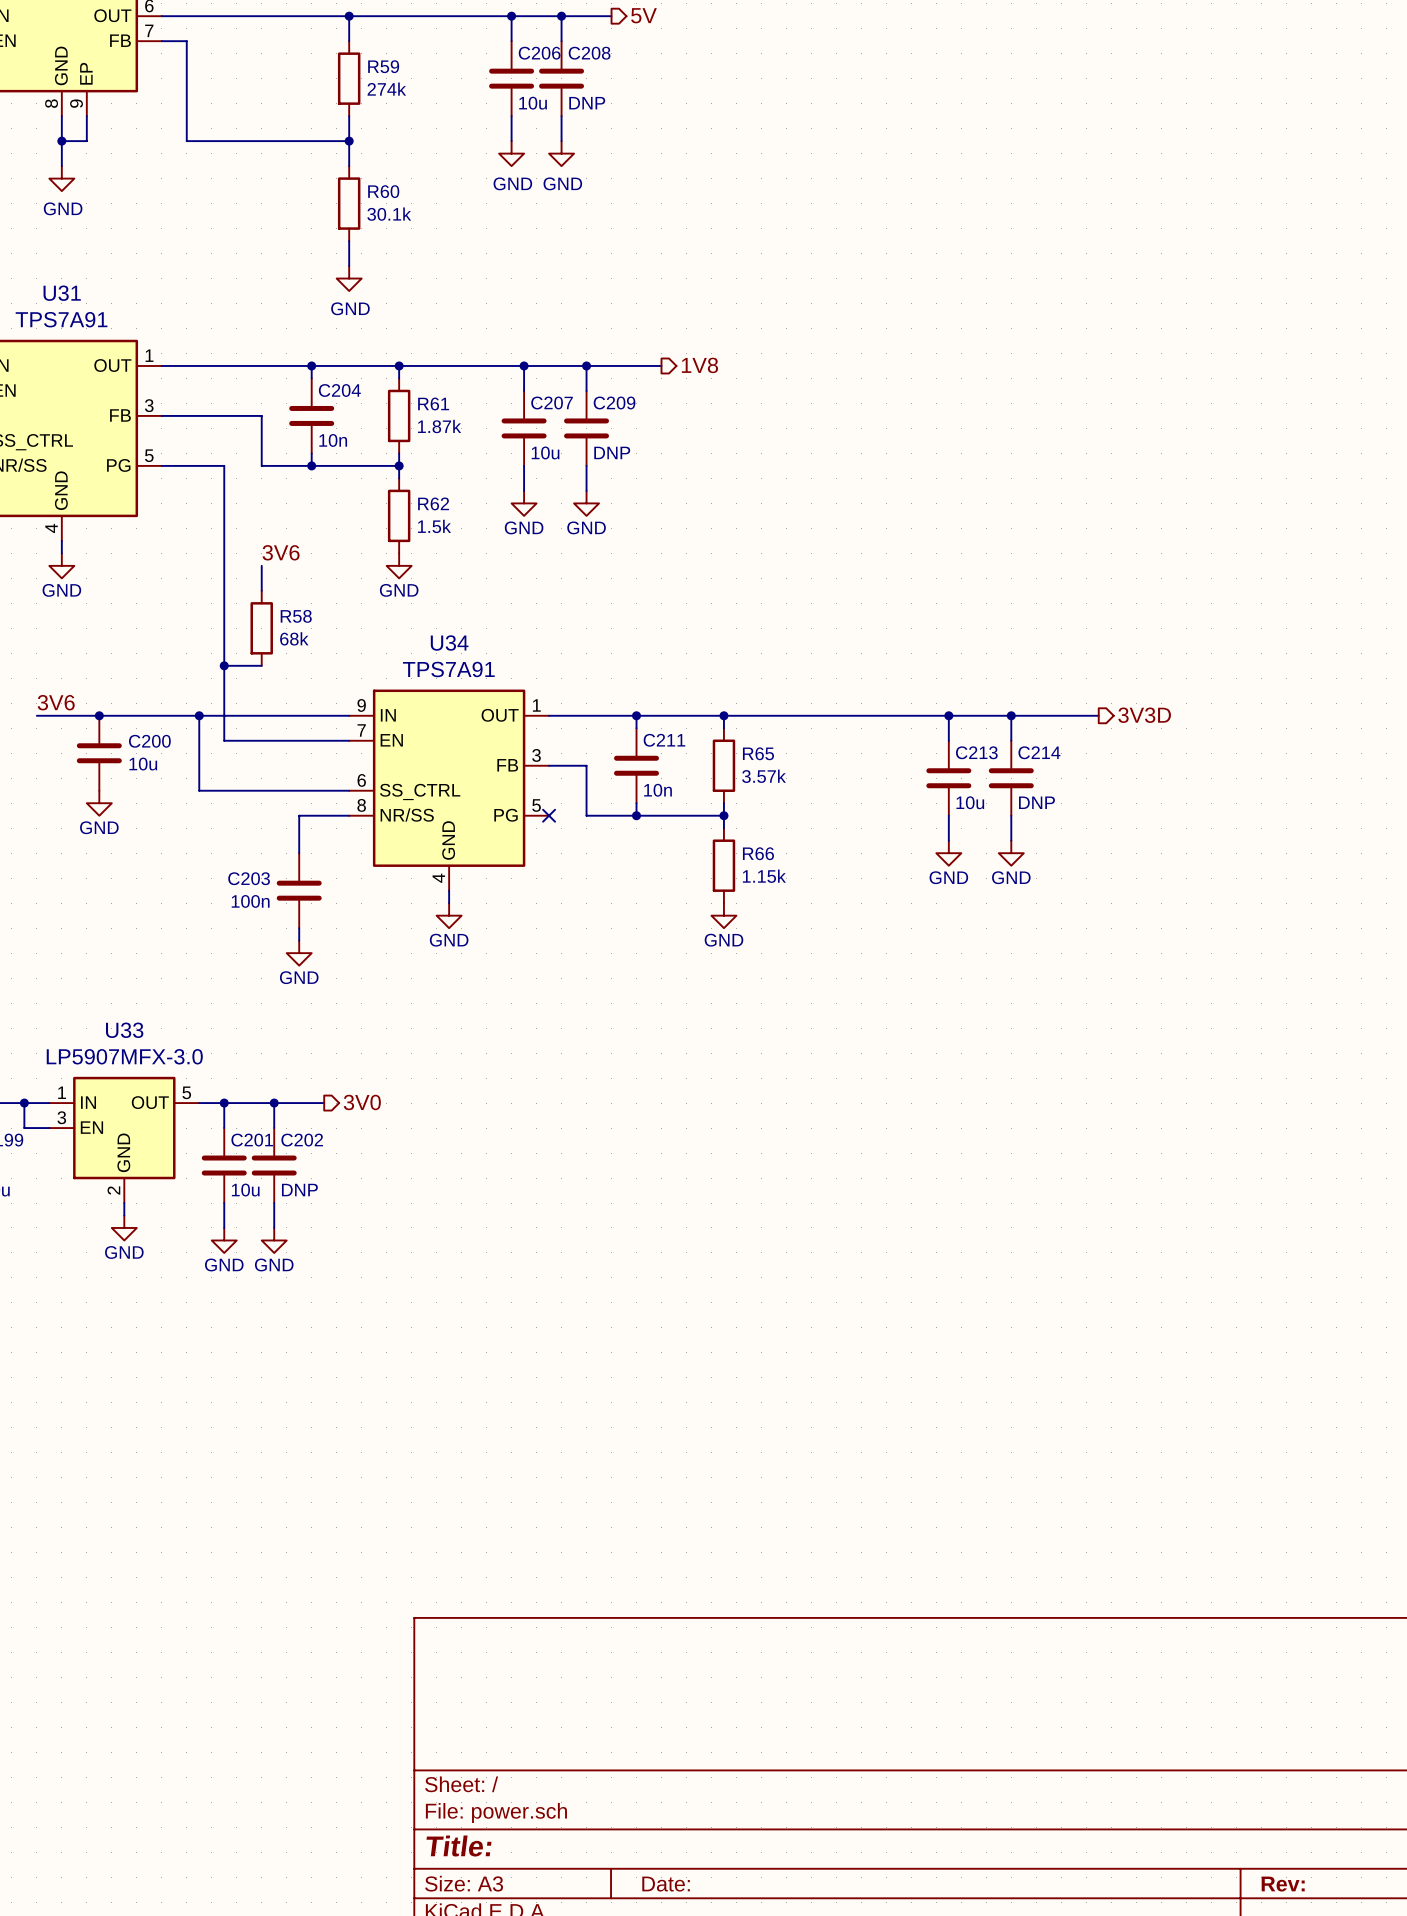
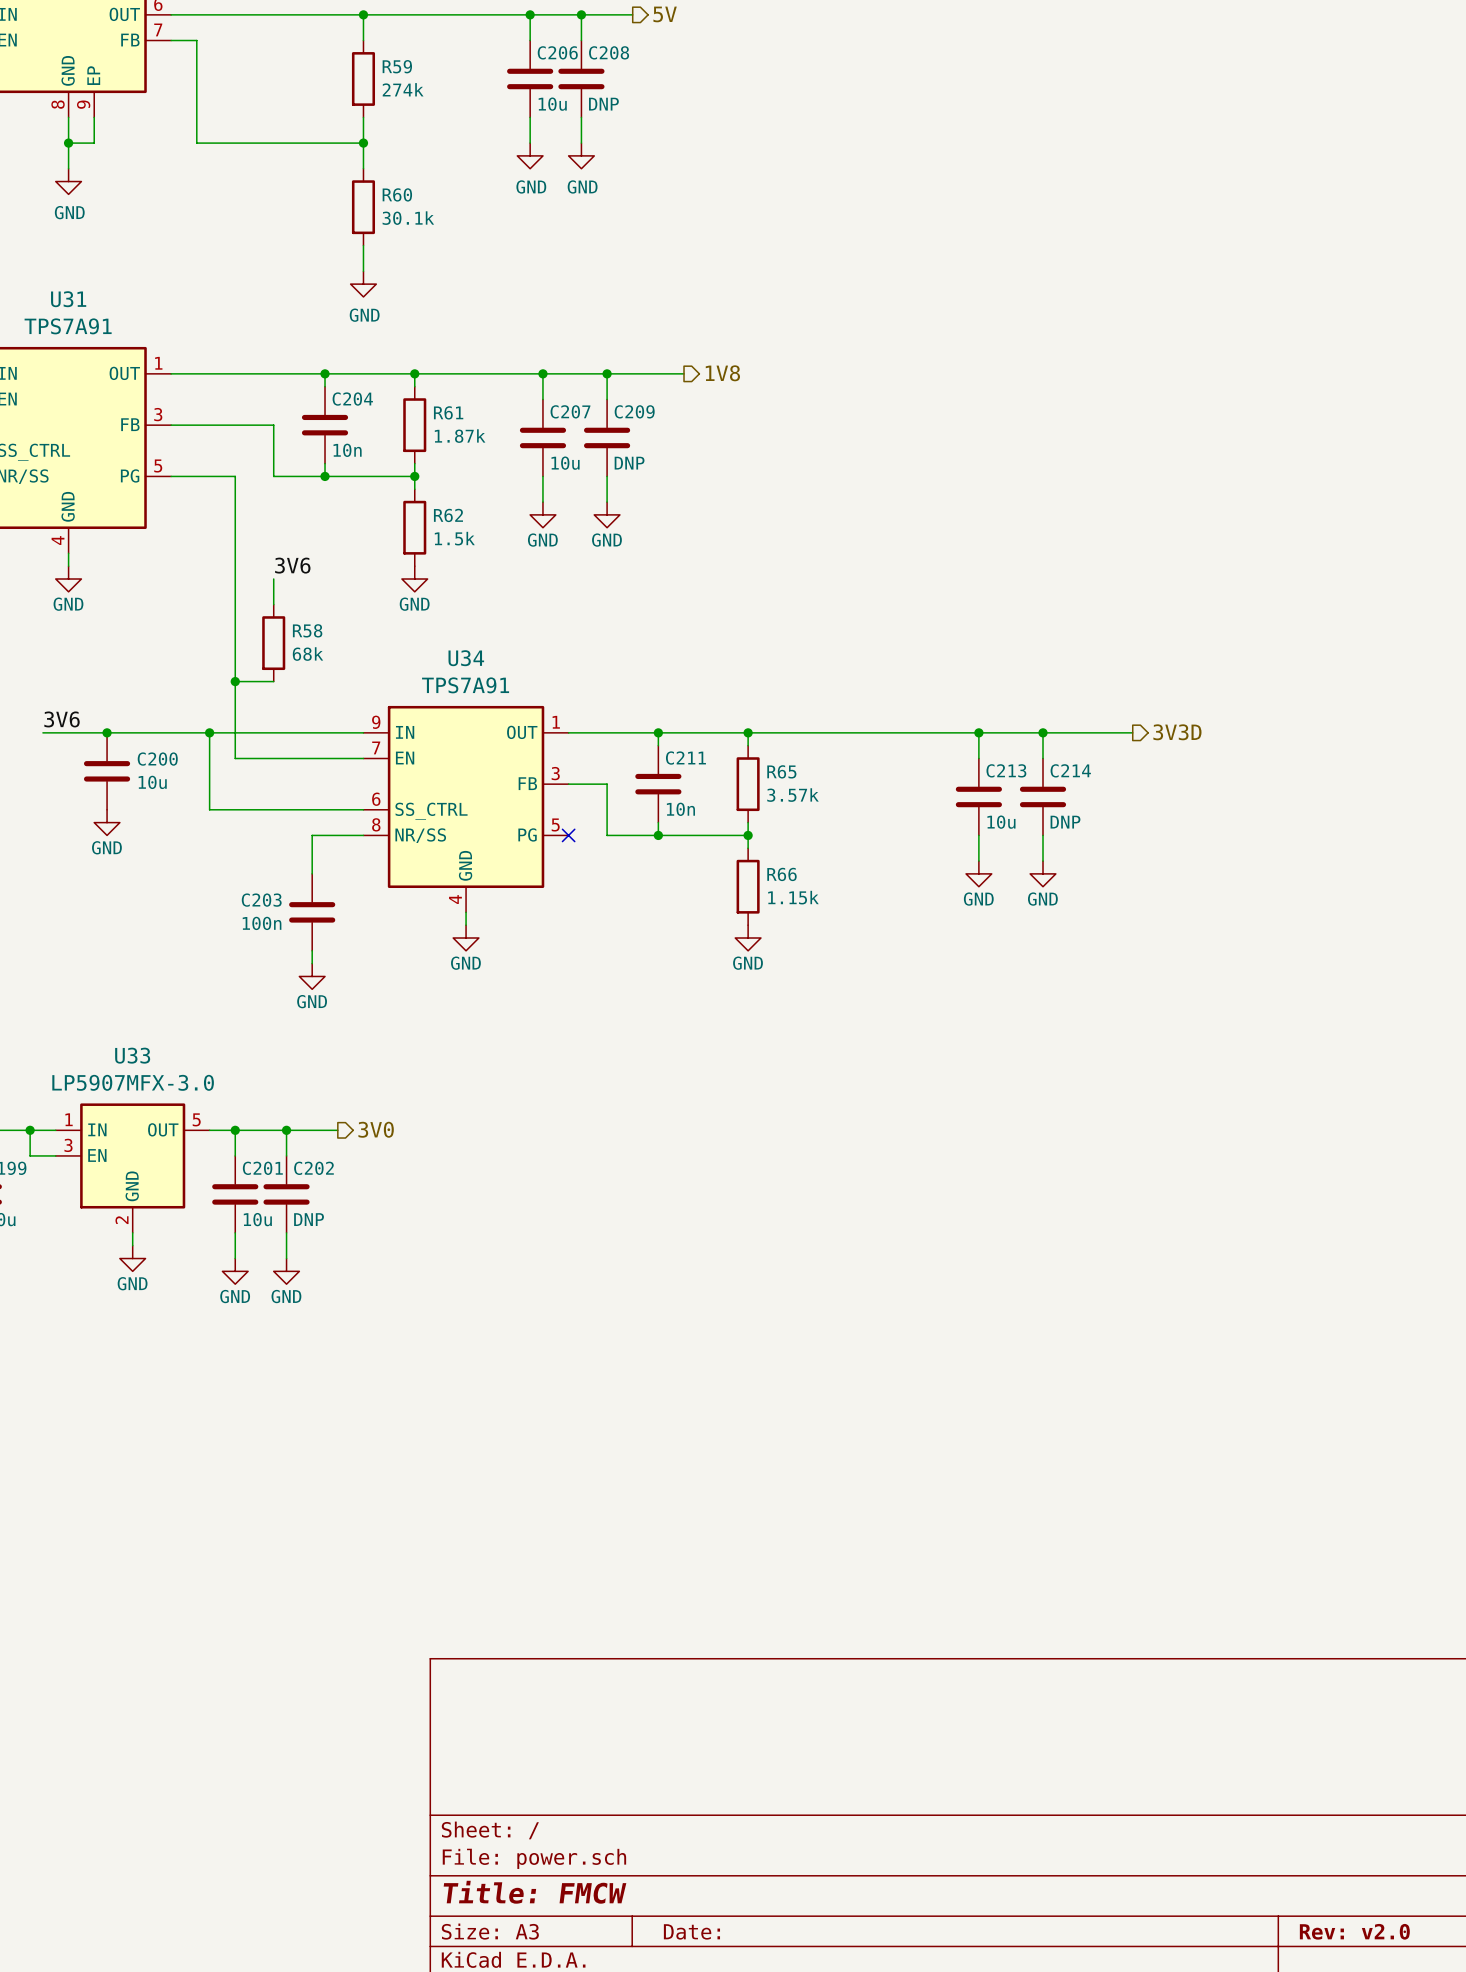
title block: Title: (459, 1846) -> Title: FMCW (535, 1892)
title block: Rev: (1283, 1884) -> Rev: v2.0 (1354, 1931)

